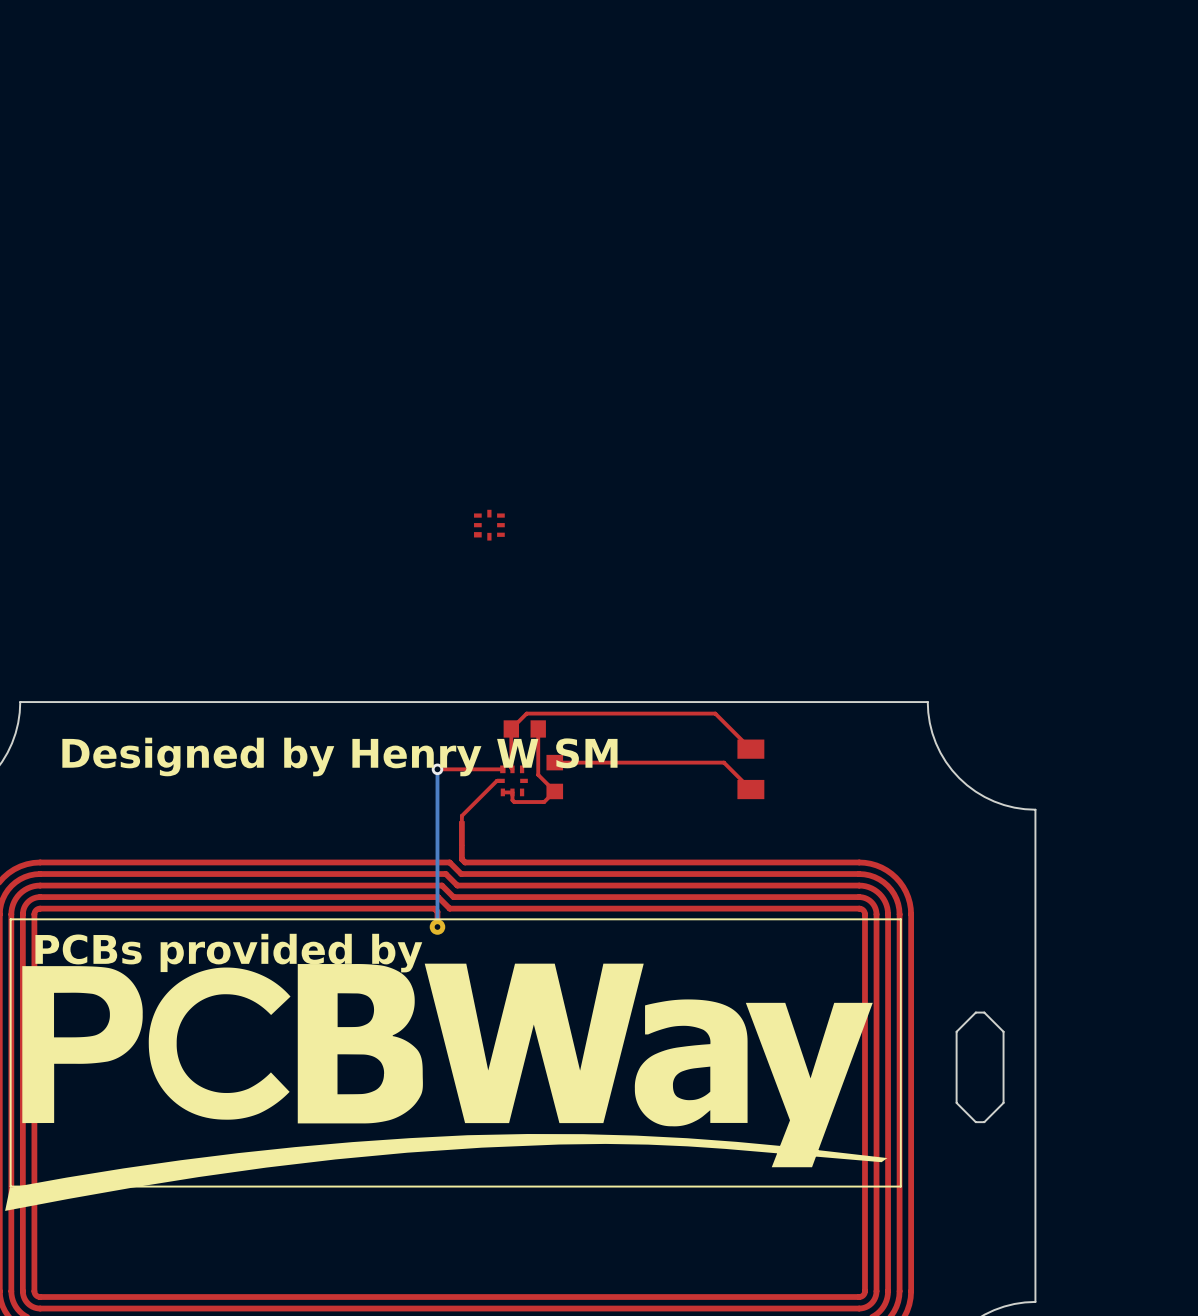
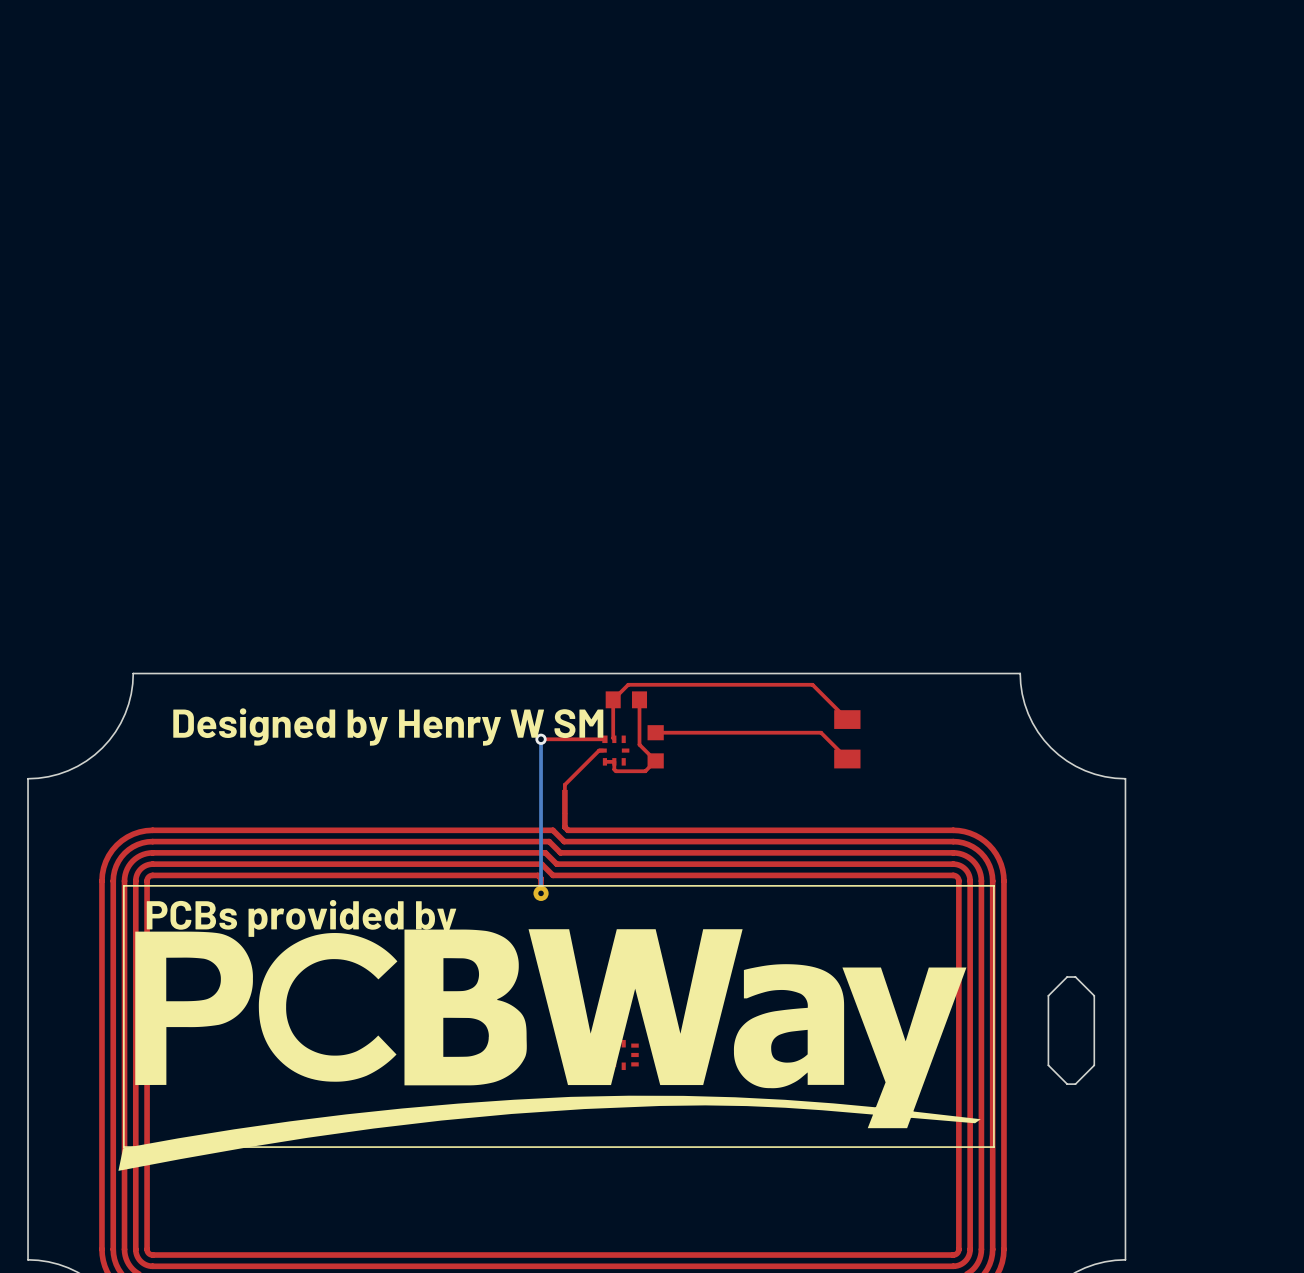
part: (489, 525) -> none
part: none -> (623, 1054)

